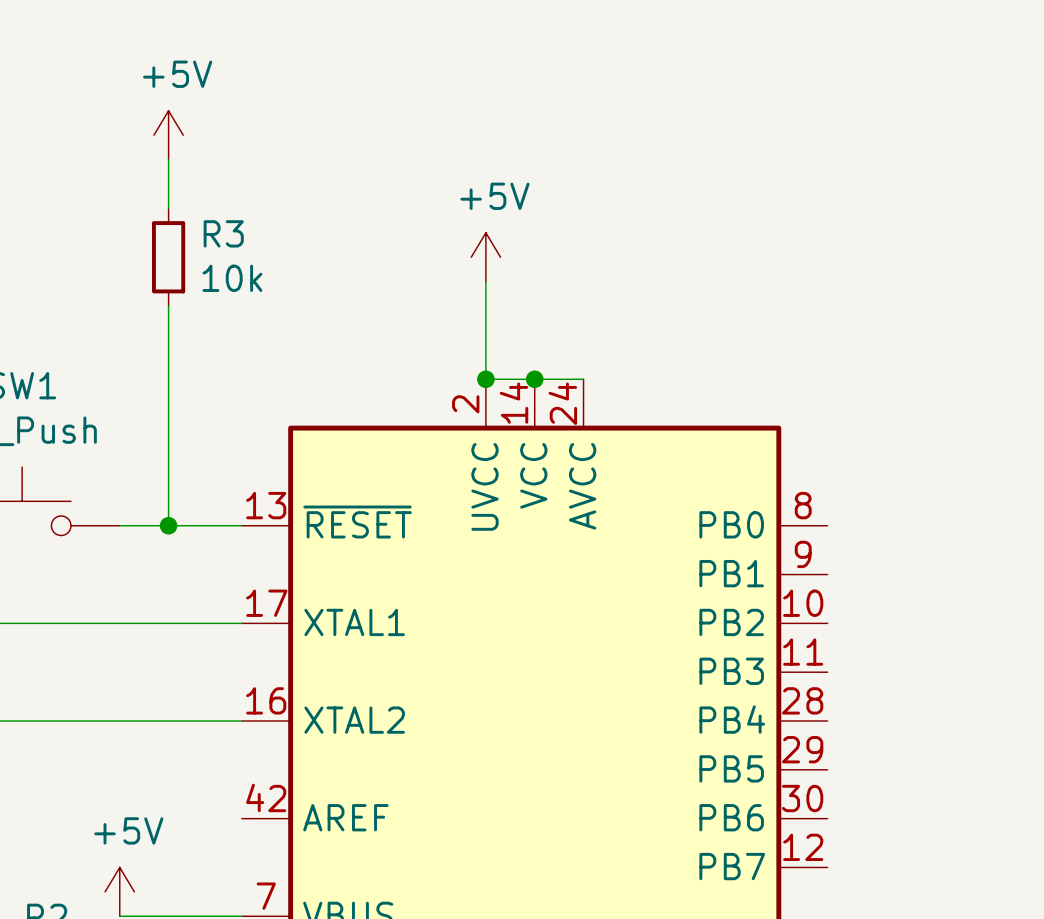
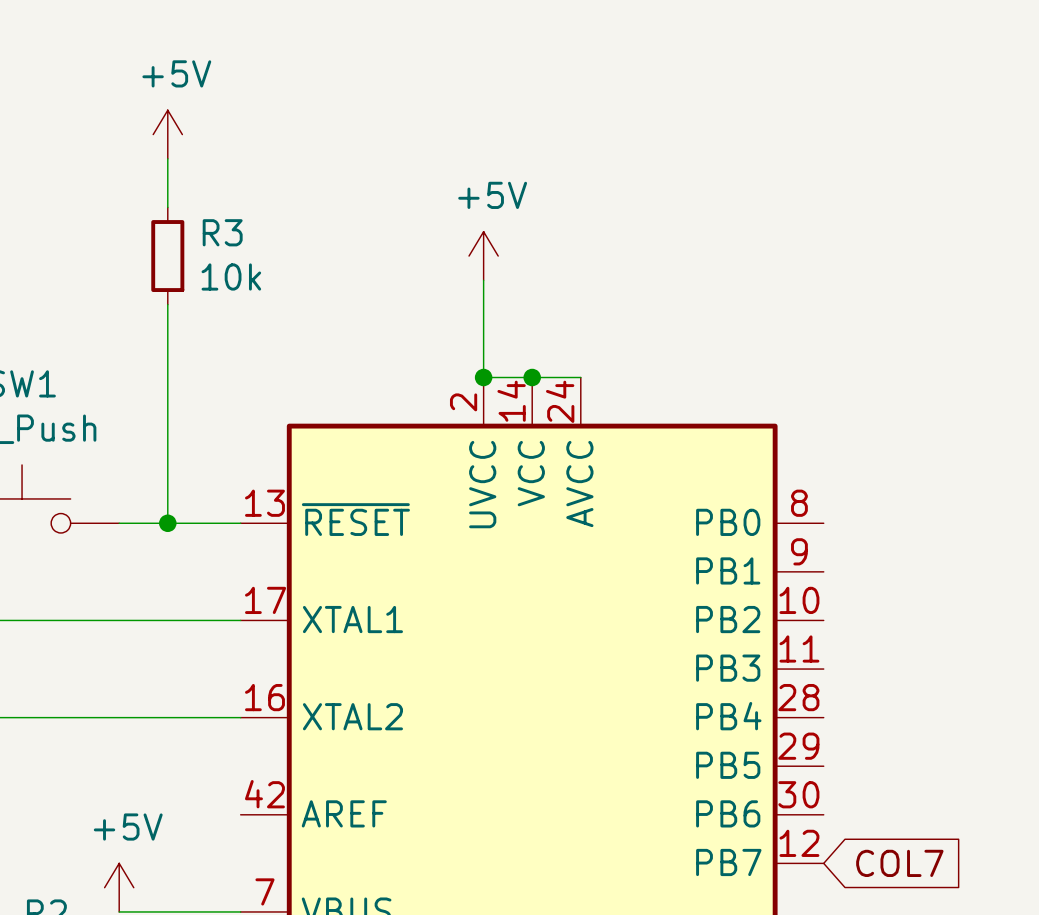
global label: none -> COL7 (899, 863)

